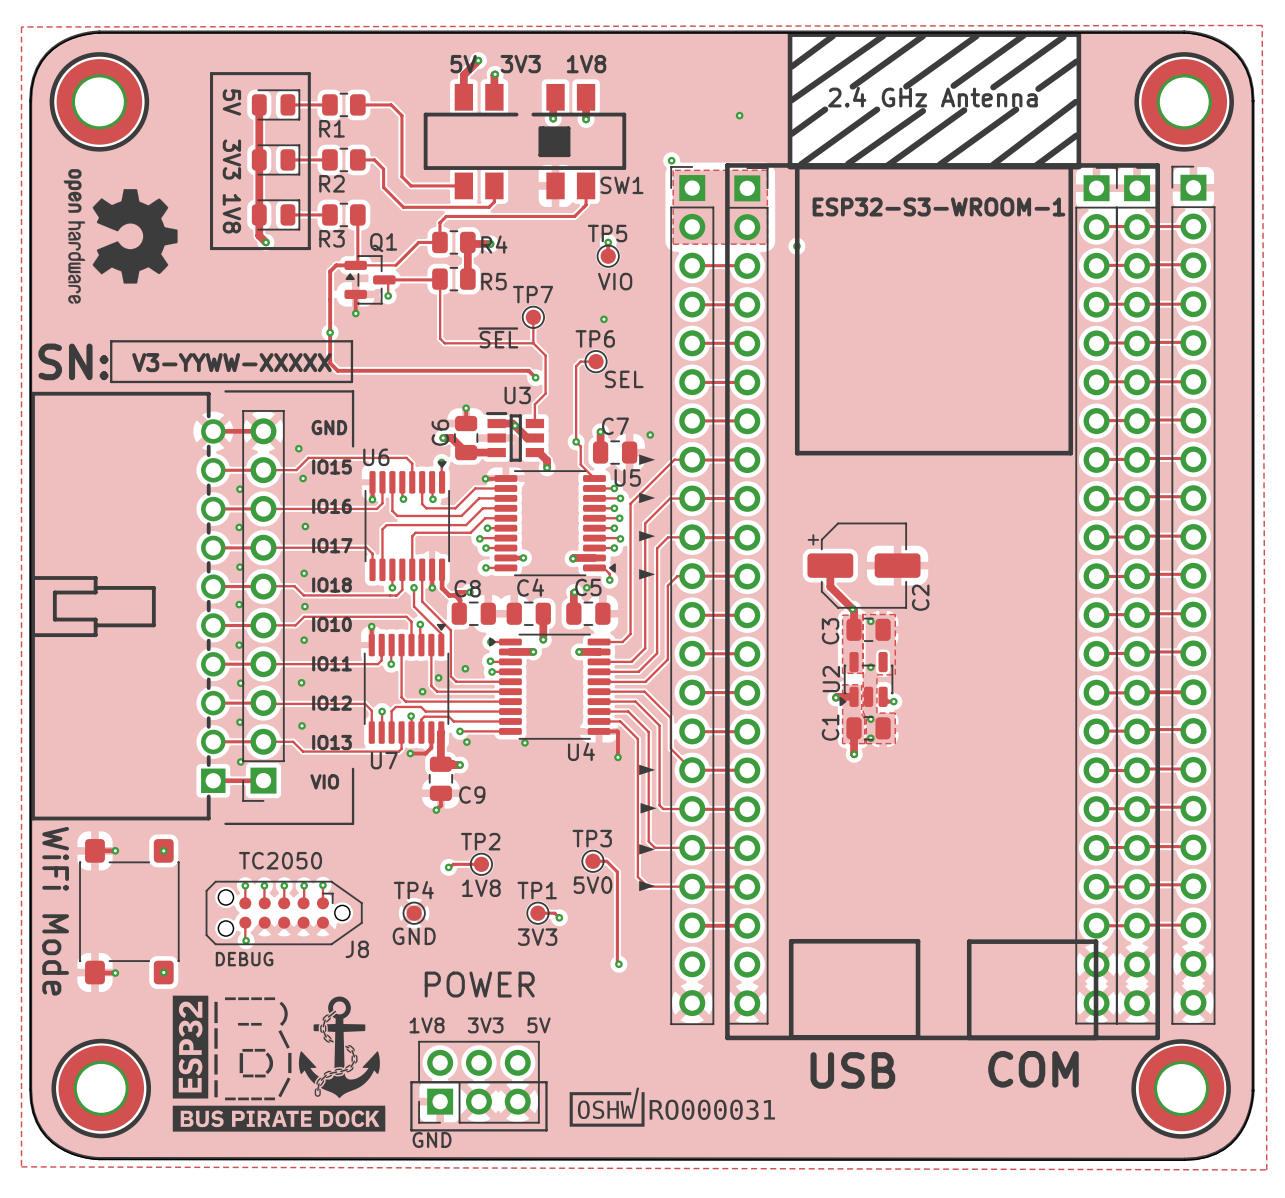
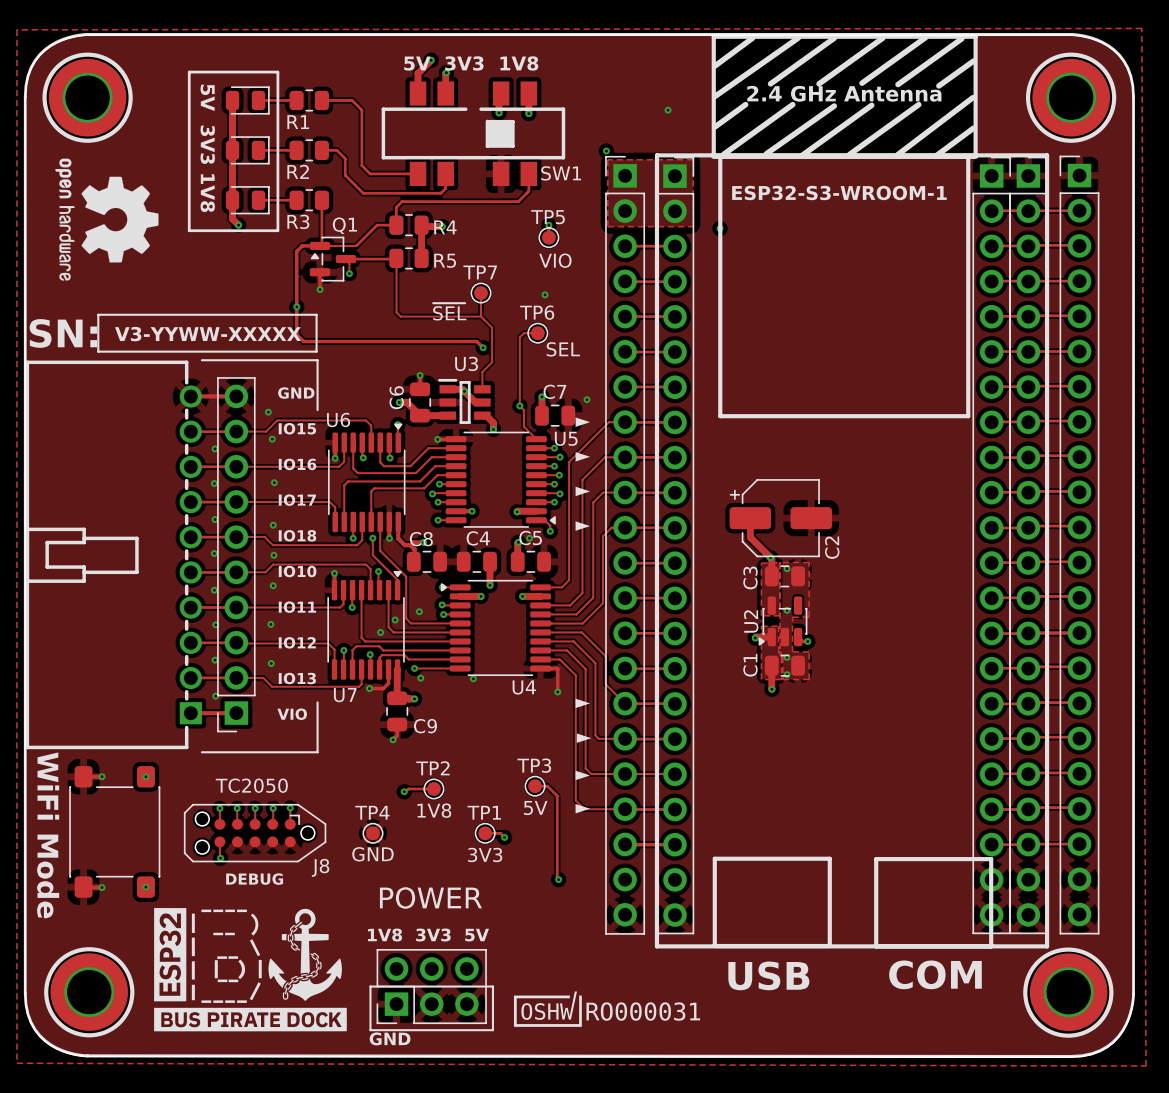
TP3 value: 5V0 (592, 885) -> 5V (535, 808)
text position: DEBUG (244, 959) -> DEBUG (254, 879)

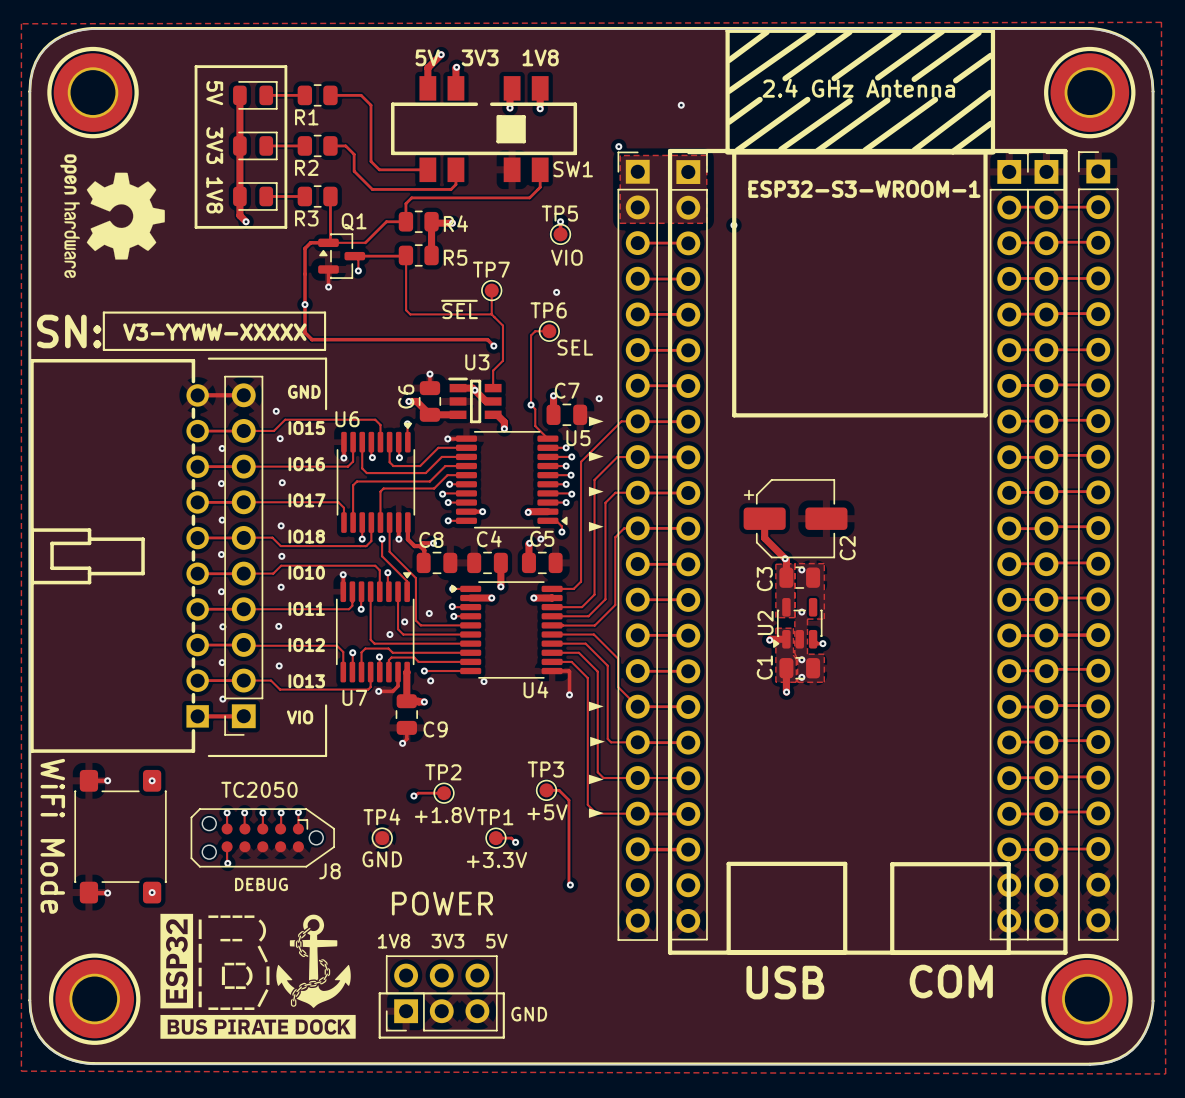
TP3 value: 5V (535, 808) -> +5V (547, 812)
TP2 value: 1V8 (434, 810) -> +1.8V (445, 815)
TP1 value: 3V3 (485, 854) -> +3.3V (496, 860)
drawing: [513, 991, 701, 1027] -> none
text position: GND (390, 1038) -> GND (529, 1014)

